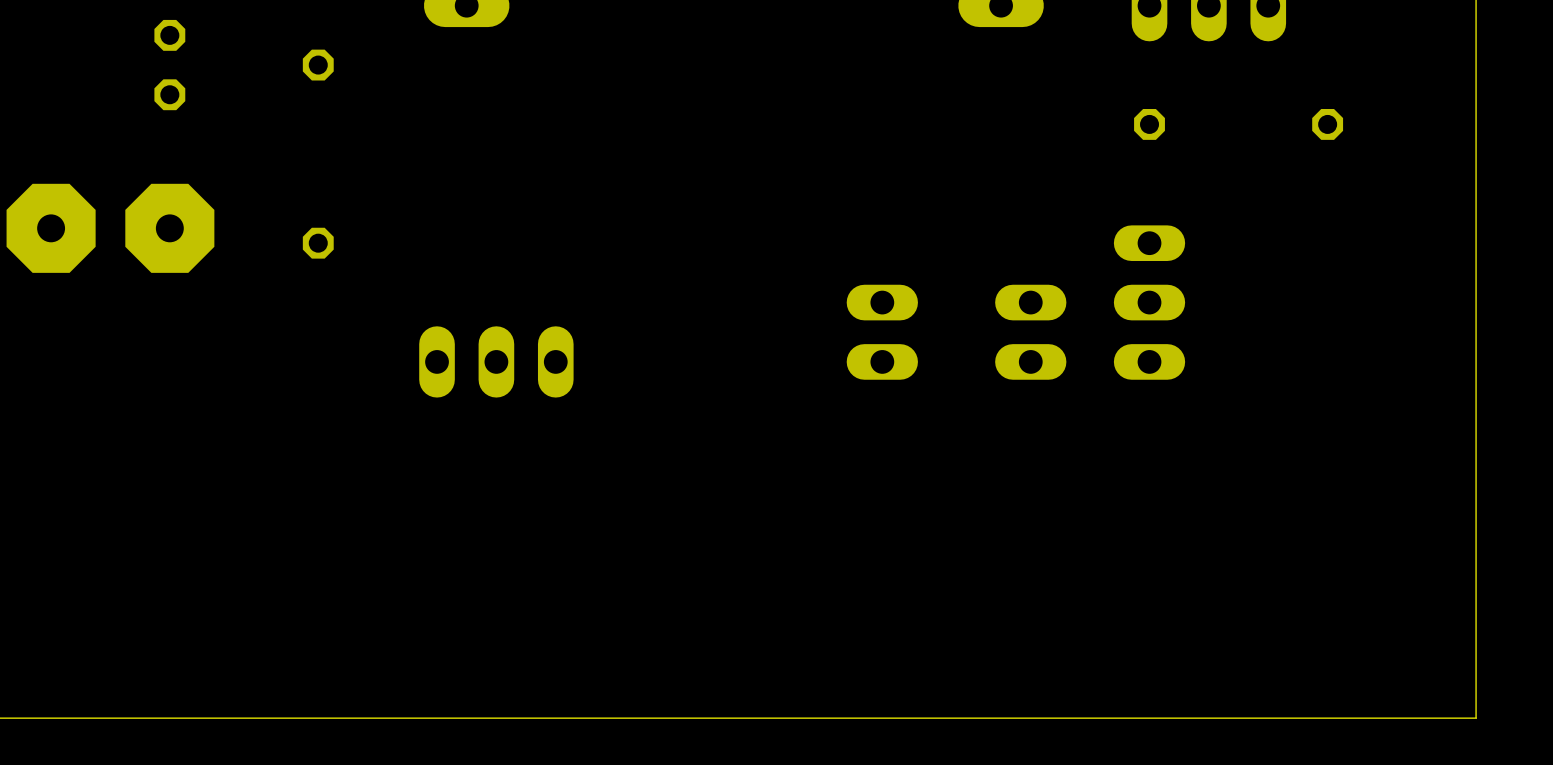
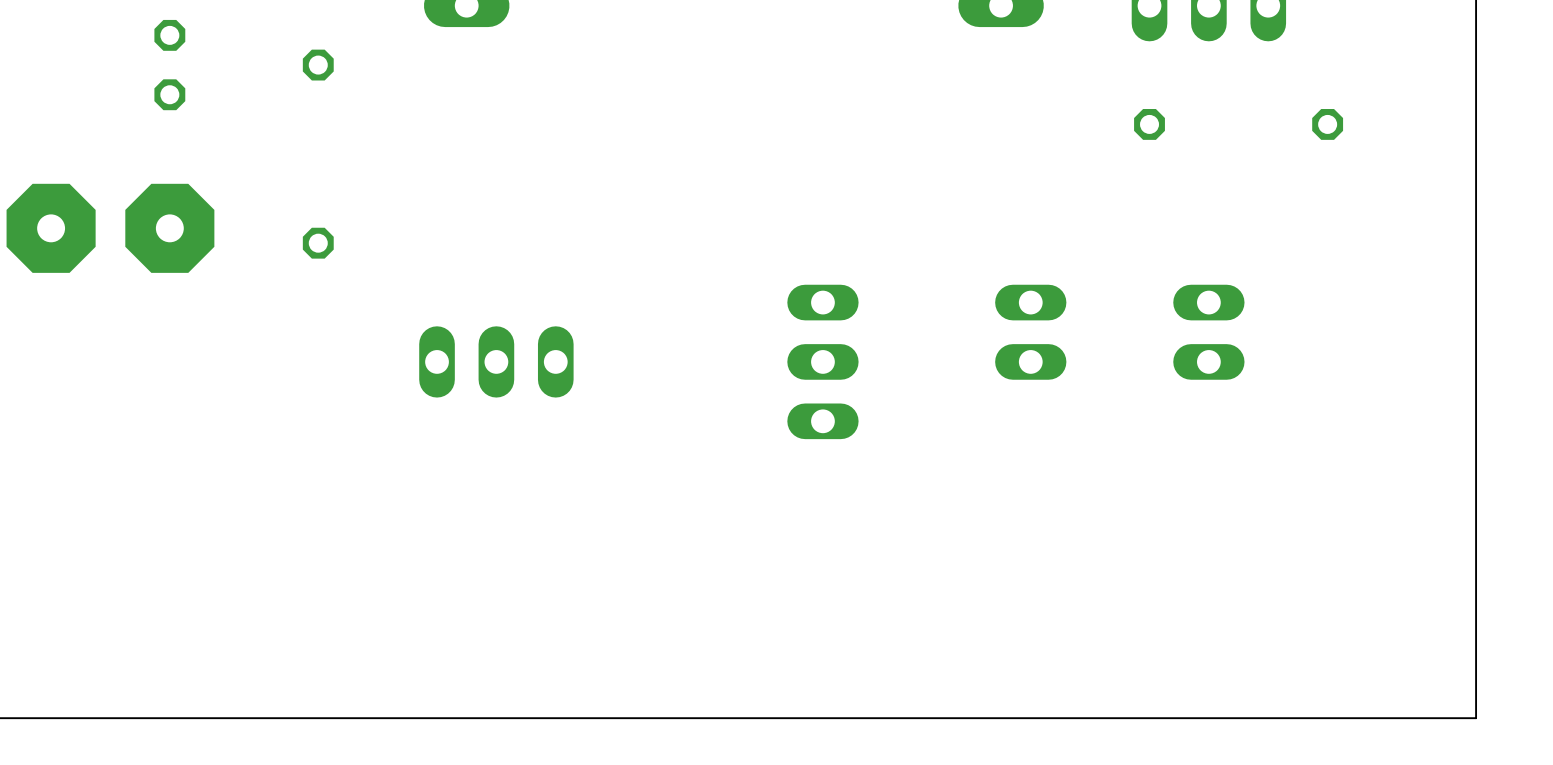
part position: (1149, 302) -> (822, 361)
part position: (882, 332) -> (1208, 332)

